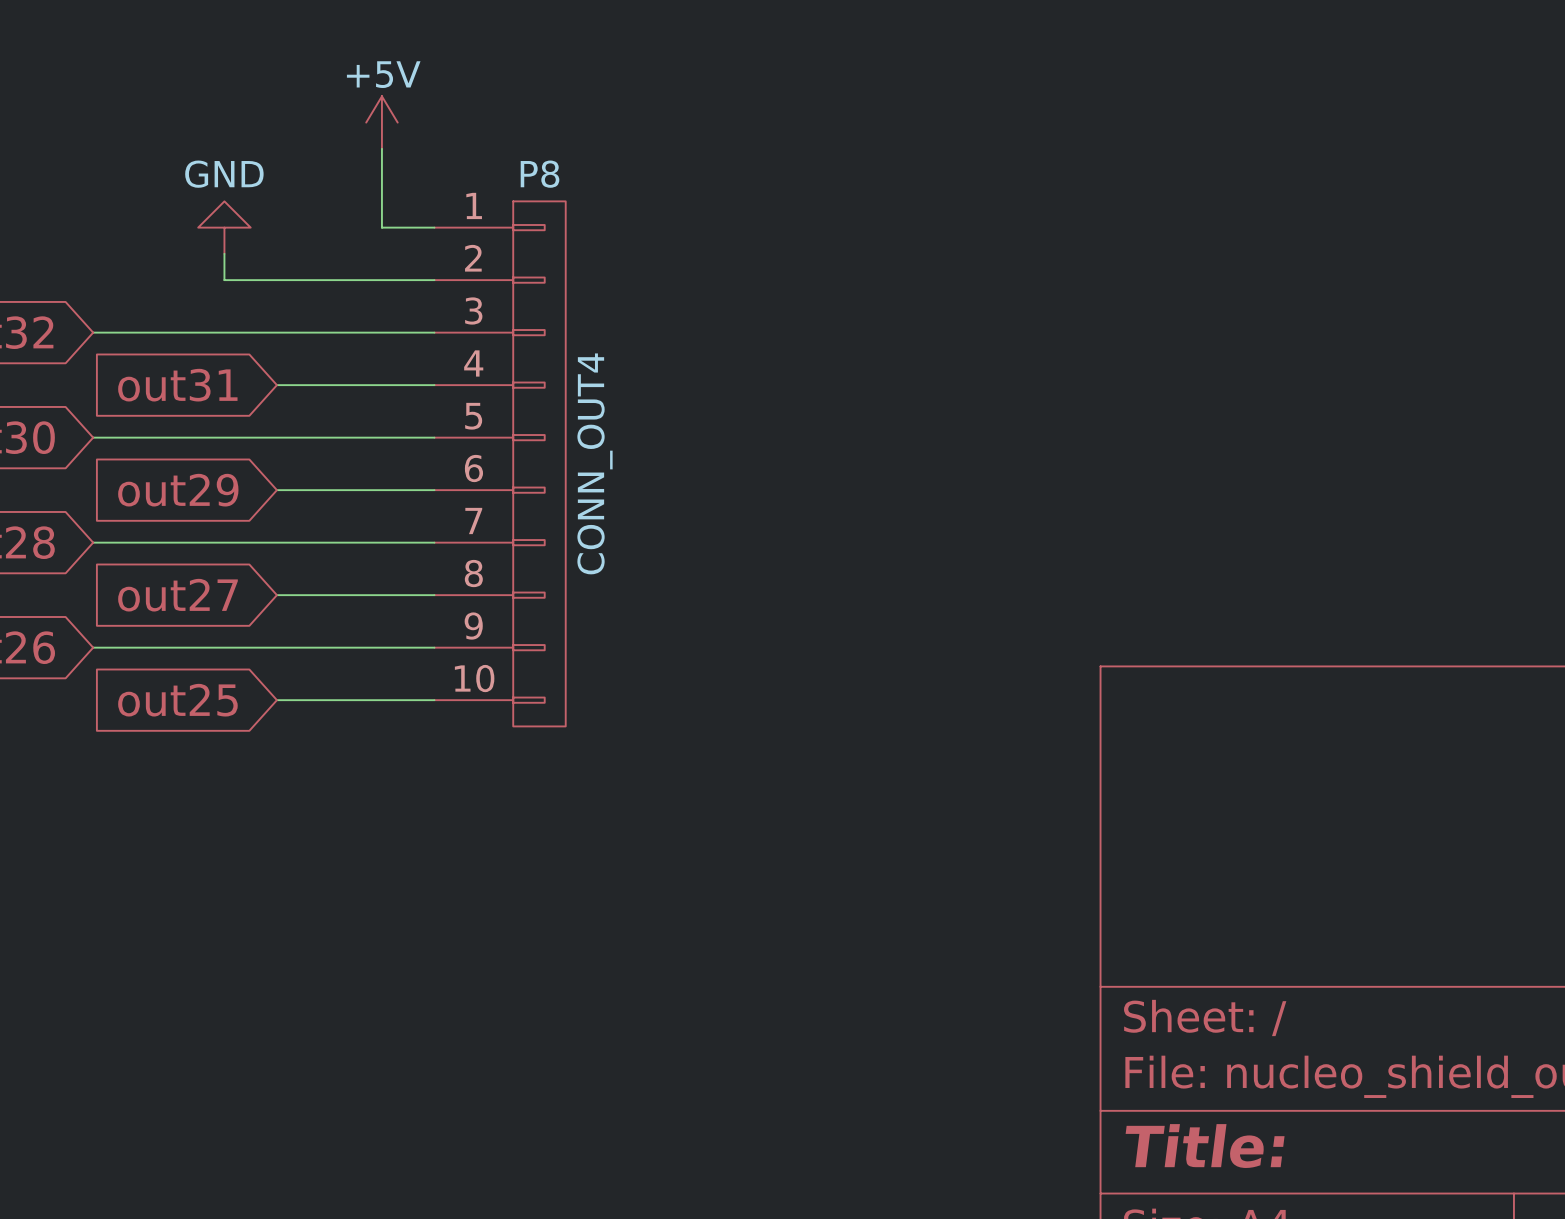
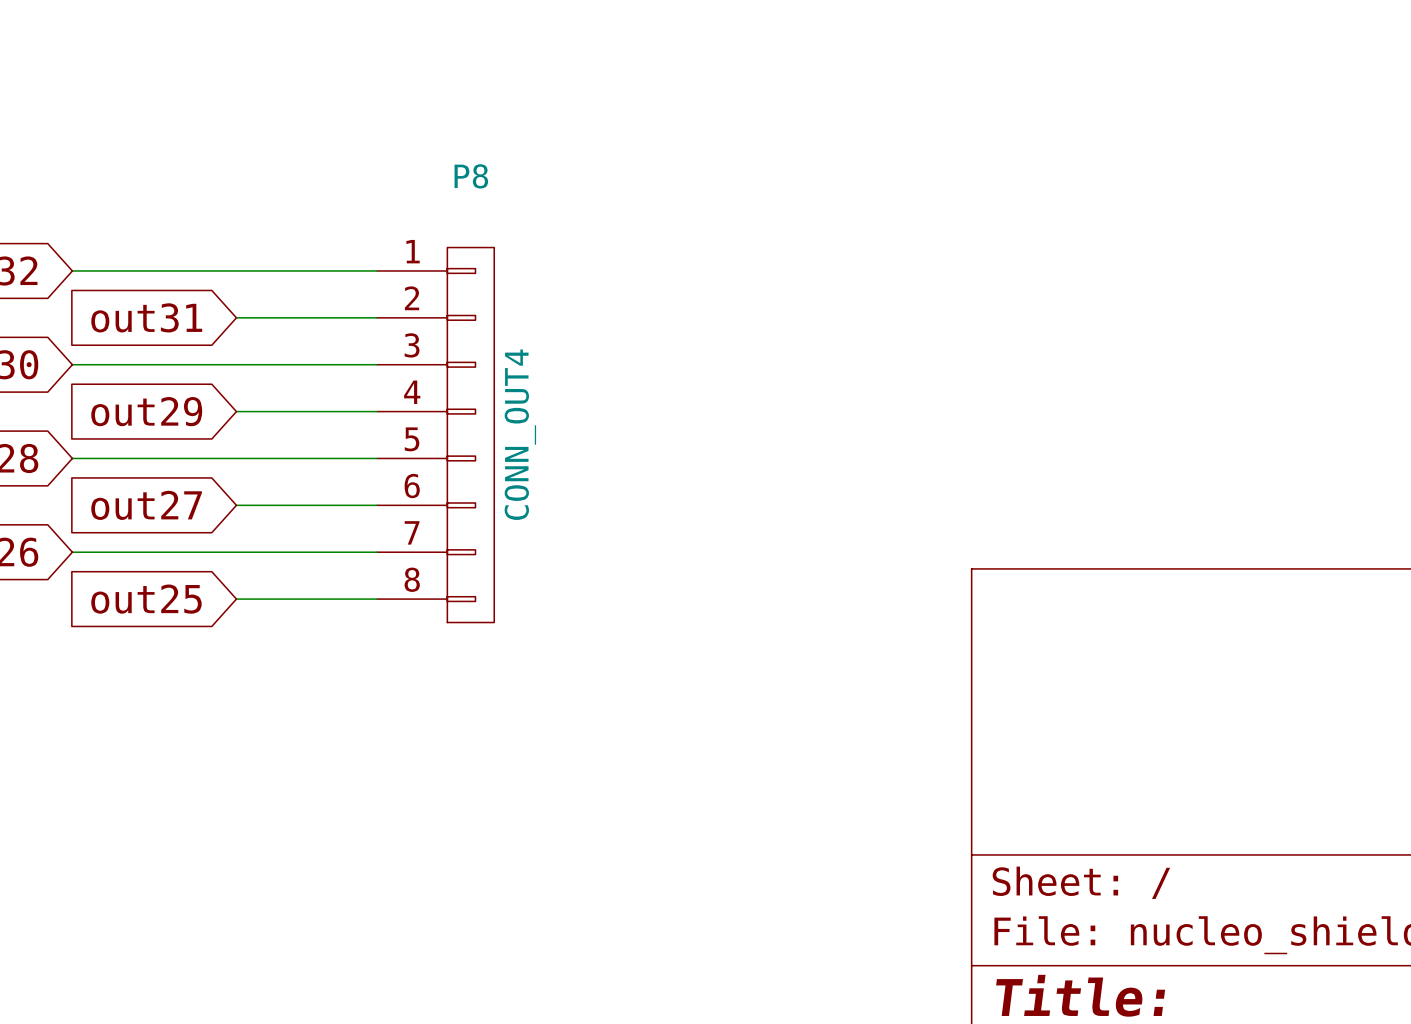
power symbol: +5V (381, 122) -> none
wire: (381, 148) (381, 227) (434, 227) -> none
P8 symbol: [434, 201, 566, 727] -> [377, 247, 495, 623]
power symbol: GND (224, 227) -> none
wire: (224, 253) (224, 280) (434, 280) -> none

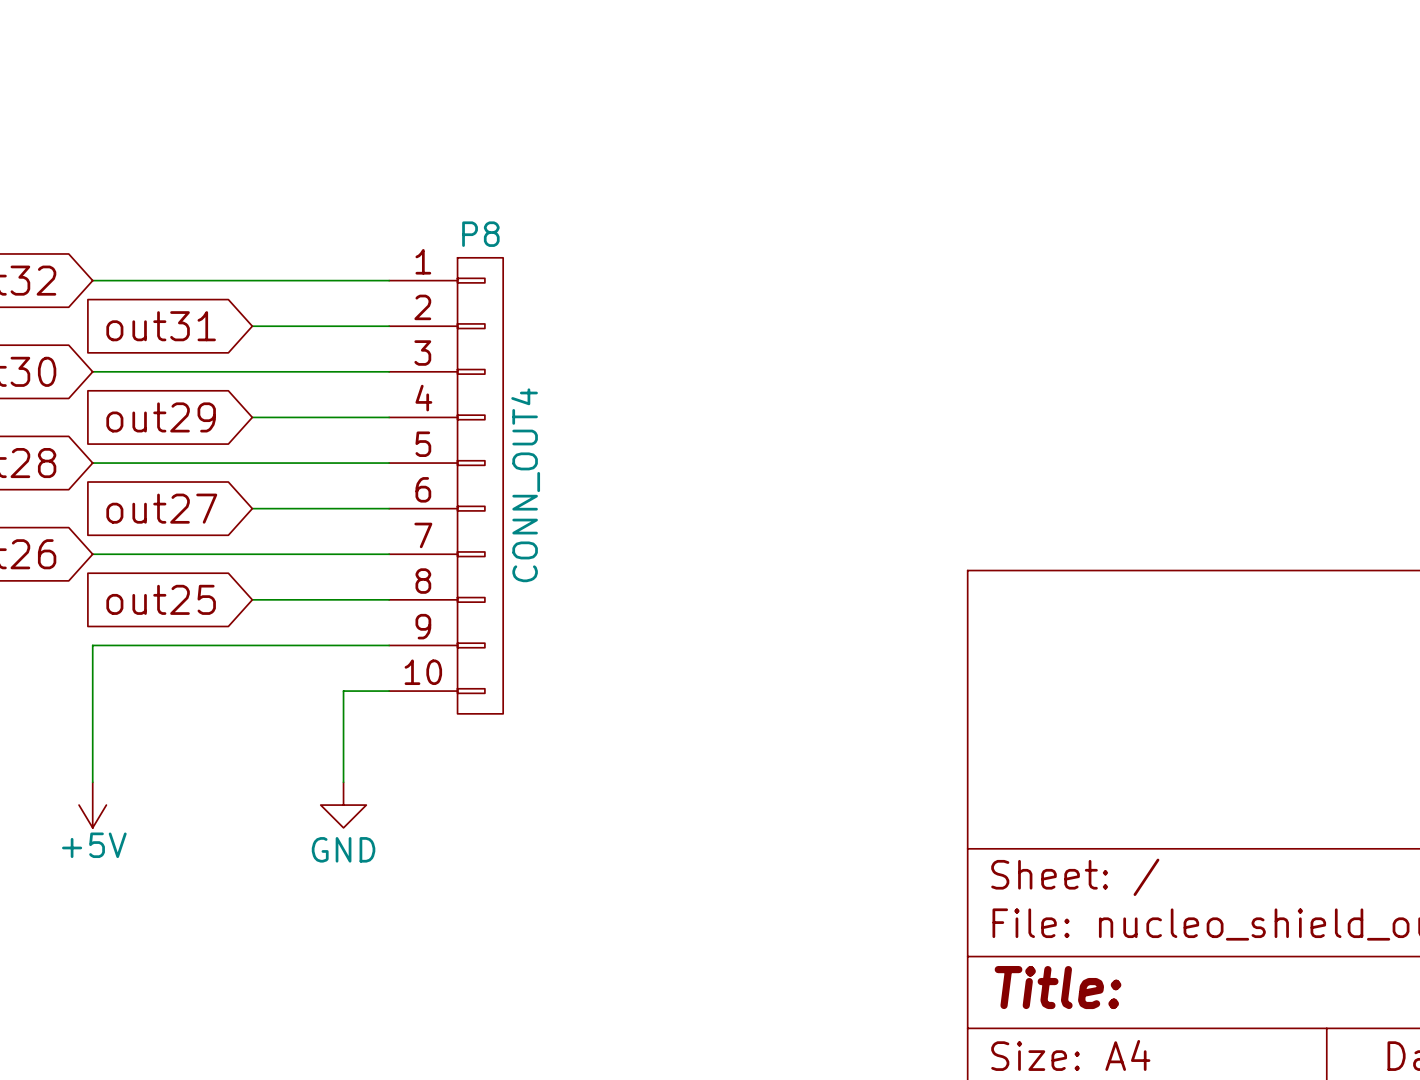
P8 symbol: [377, 247, 495, 623] -> [389, 257, 504, 714]
wire: none -> (389, 645) (92, 645) (92, 782)
wire: none -> (389, 691) (343, 691) (343, 782)
power symbol: none -> +5V (92, 805)
power symbol: none -> GND (343, 805)

